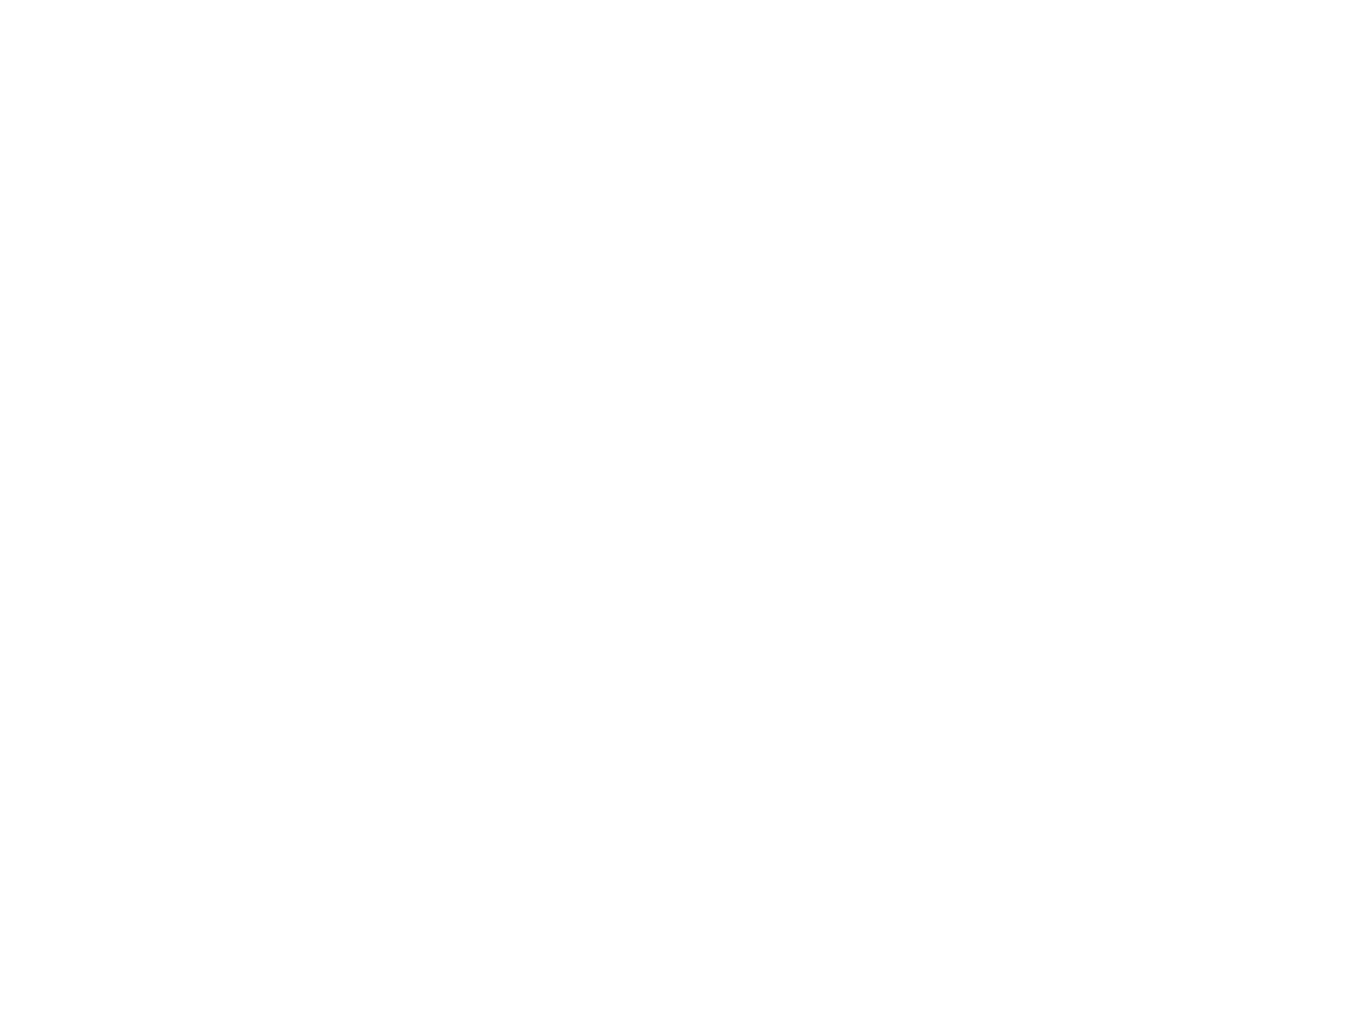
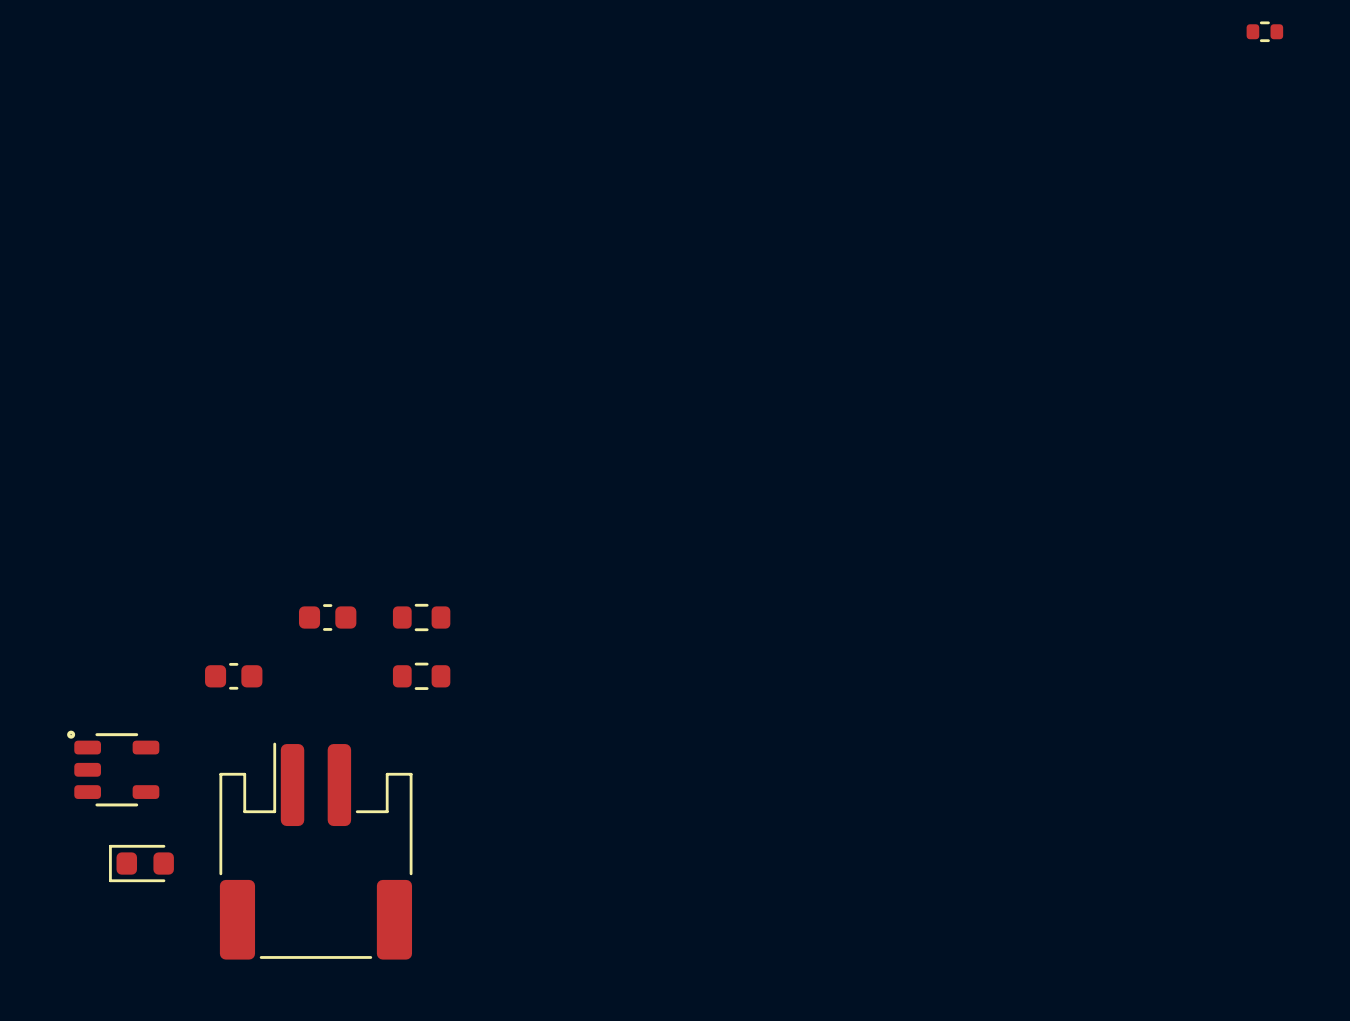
part: none -> (1264, 31)
part: none -> (327, 617)
part: none -> (421, 617)
part: none -> (233, 676)
part: none -> (421, 676)
part: none -> (113, 768)
part: none -> (315, 851)
part: none -> (141, 863)

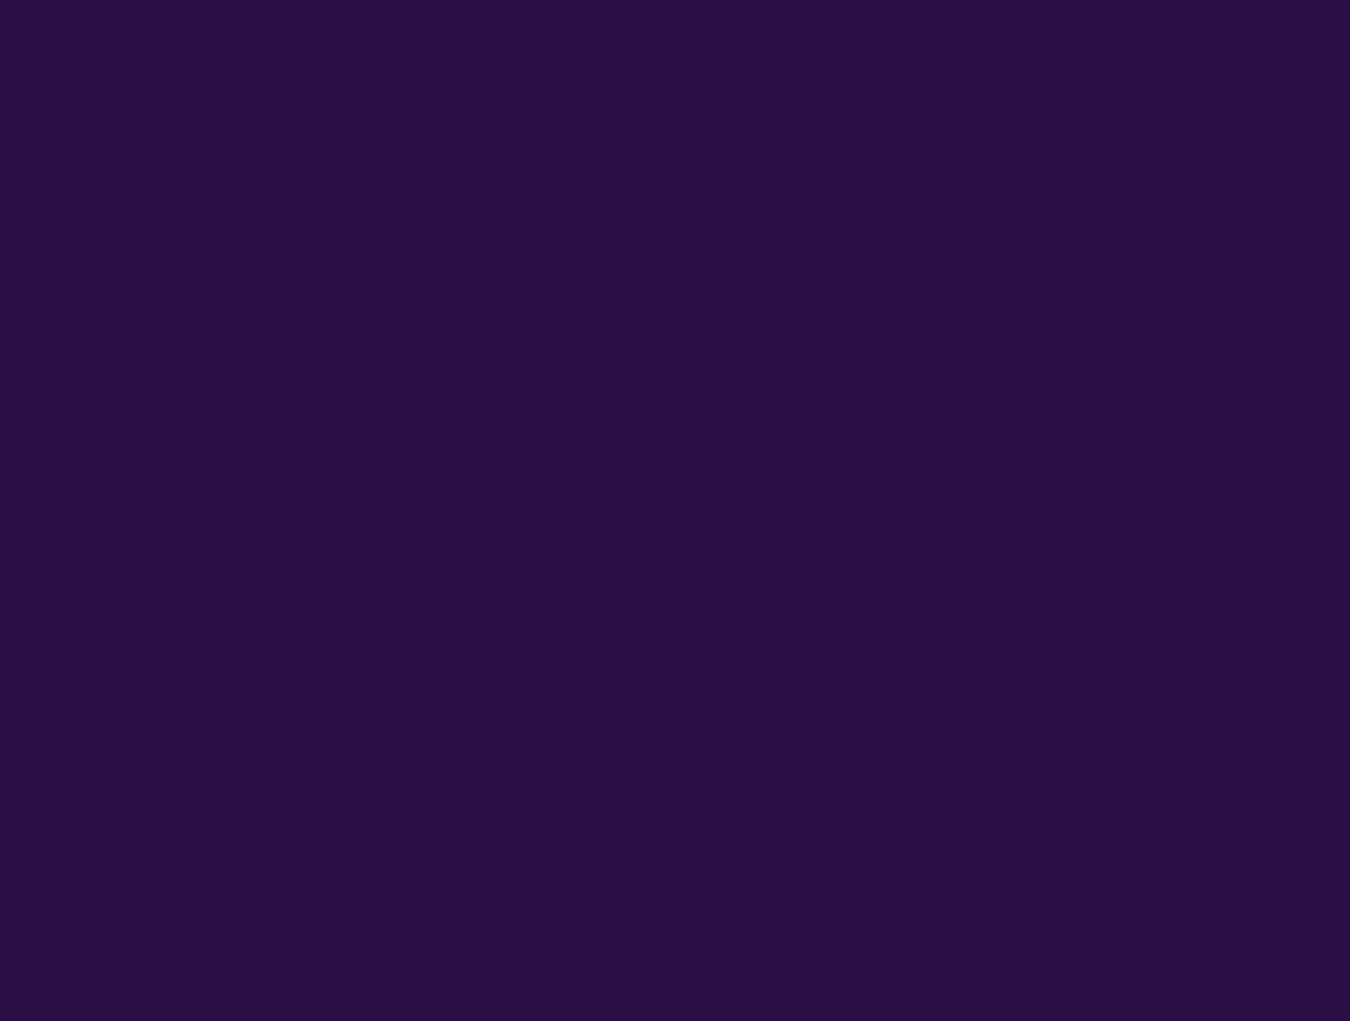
part: (1264, 31) -> none
part: (327, 617) -> none
part: (421, 617) -> none
part: (233, 676) -> none
part: (421, 676) -> none
part: (113, 768) -> none
part: (315, 851) -> none
part: (141, 863) -> none

